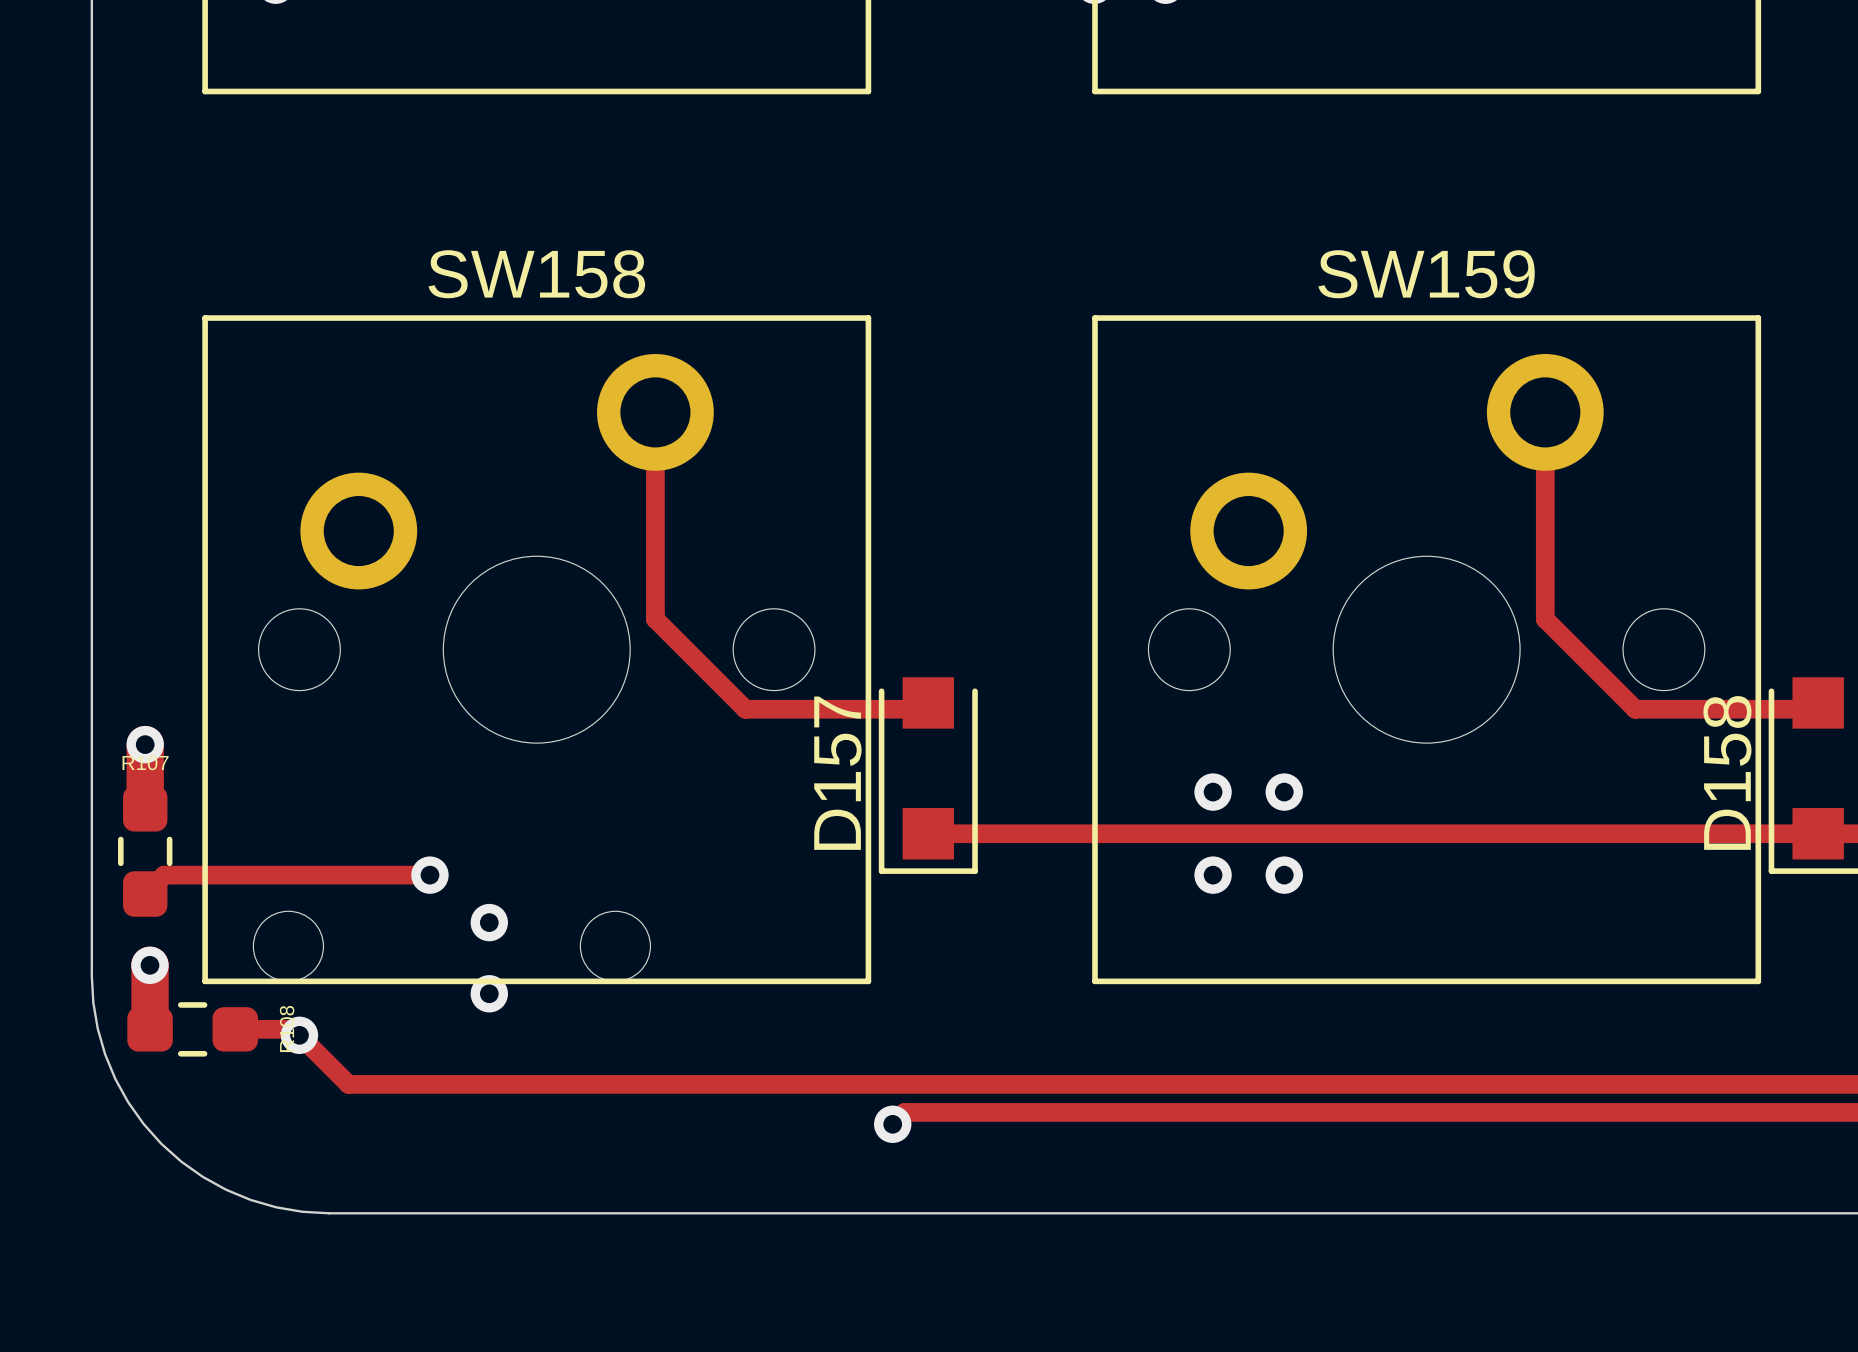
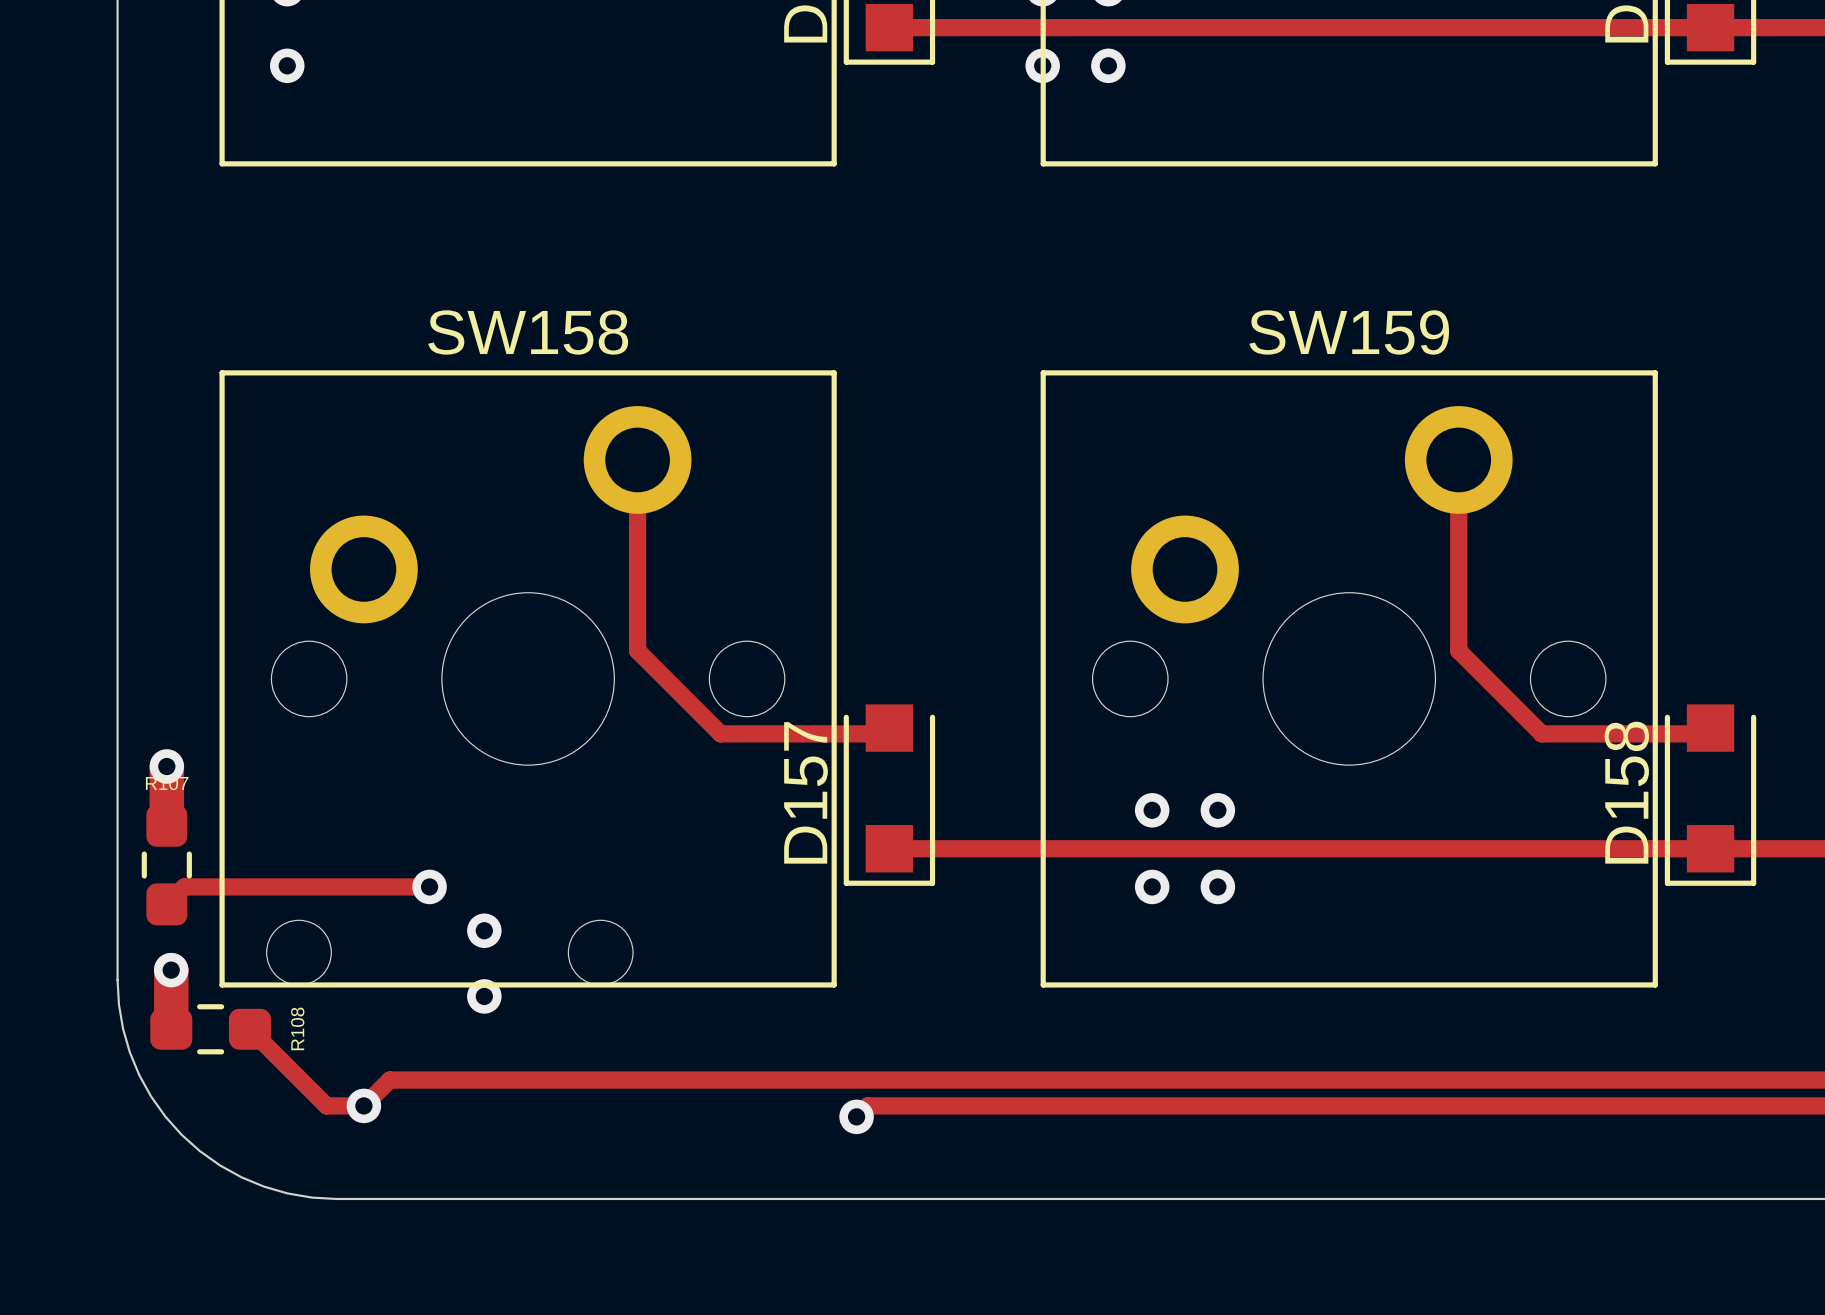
track: (235, 1029) (293, 1029) (348, 1084) (386, 1084) -> (249, 1029) (326, 1105) (363, 1105) (389, 1080)
via position: (299, 1035) -> (363, 1105)

